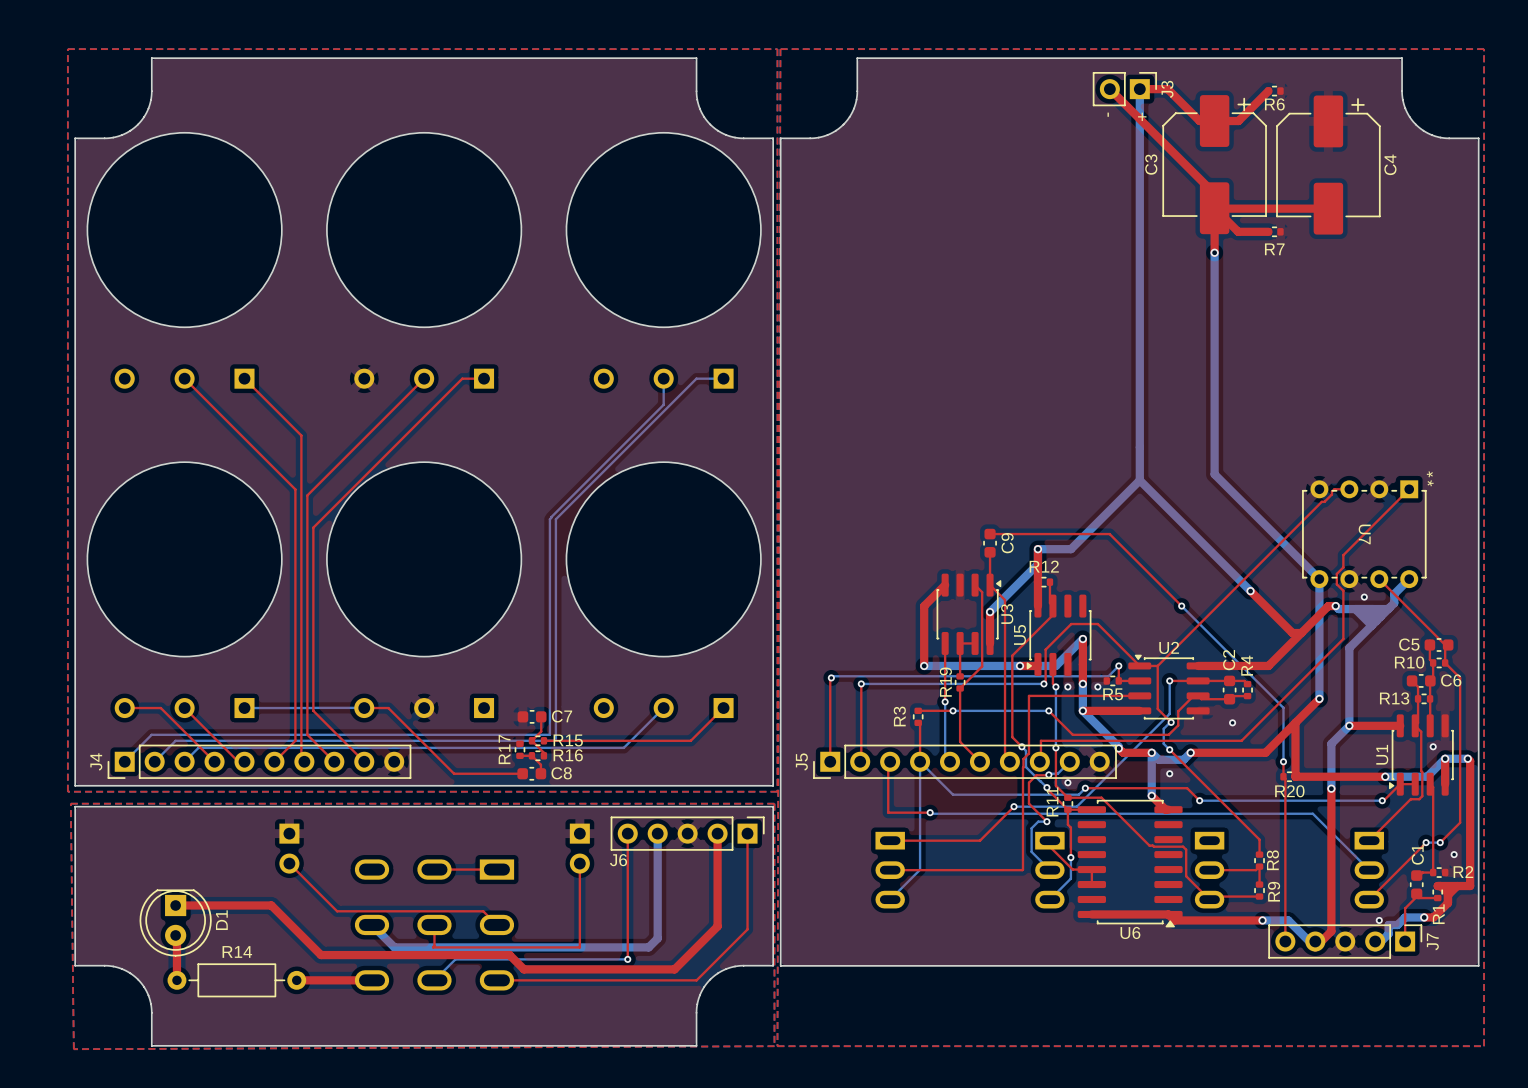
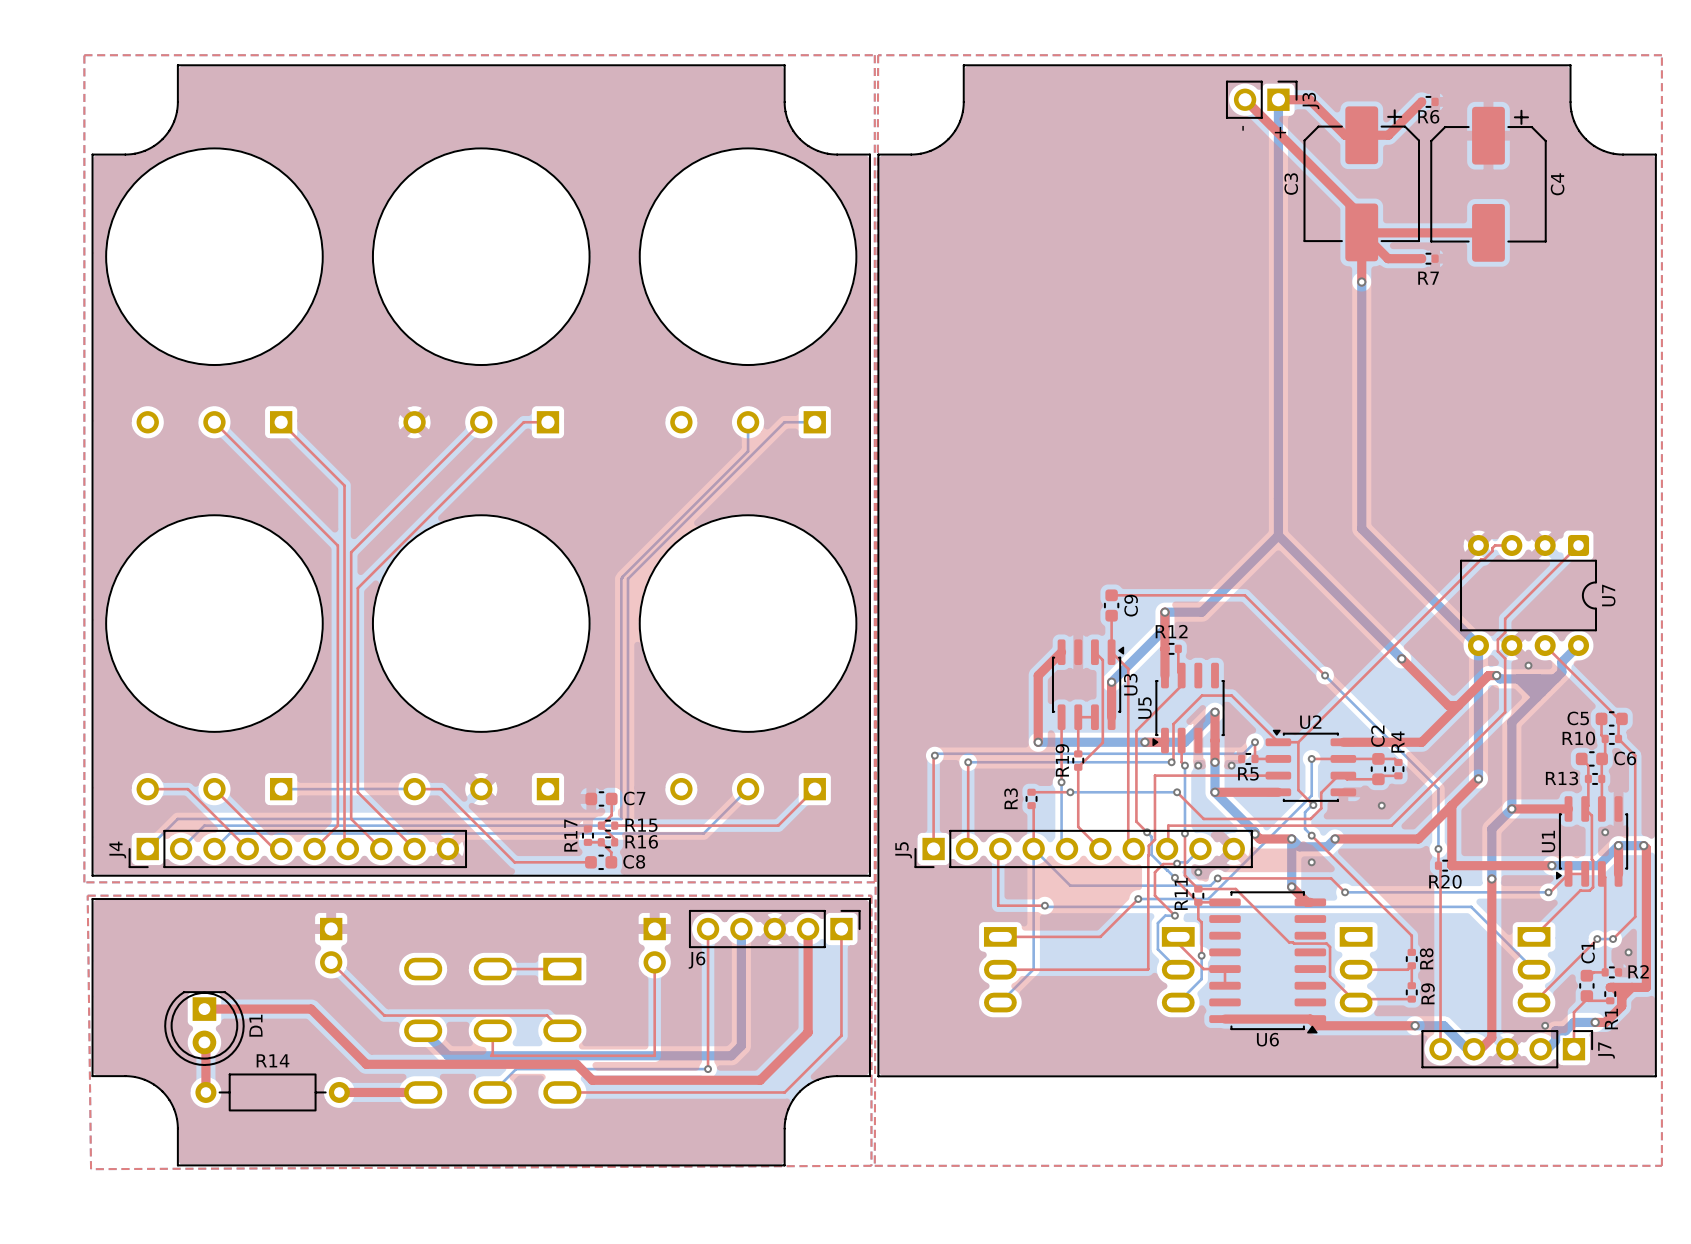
U7 footprint: [1302, 480, 1427, 589] -> [1460, 534, 1597, 657]
U7 name position: U7 (1364, 534) -> U7 (1608, 595)

